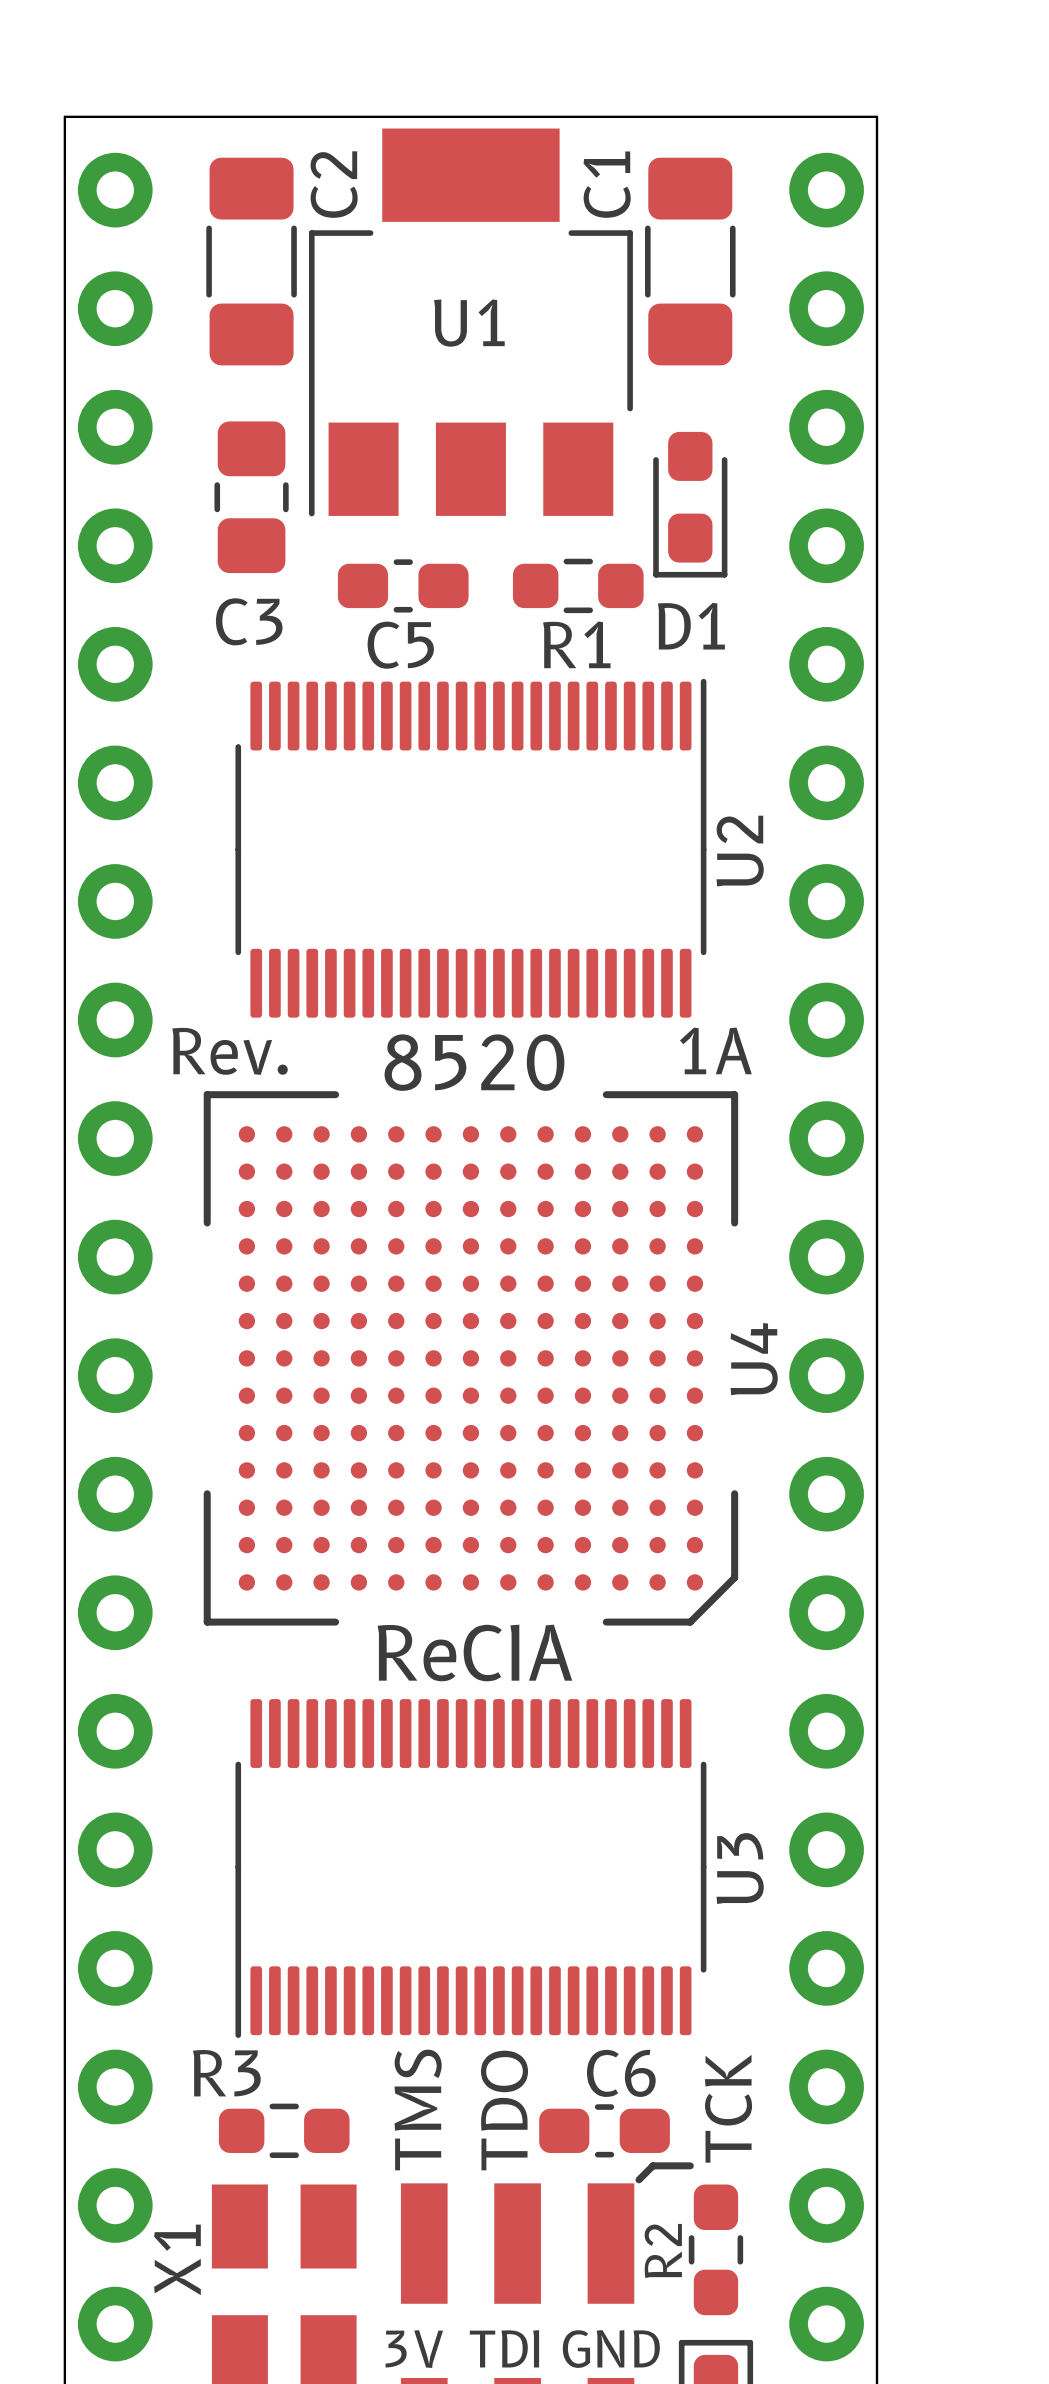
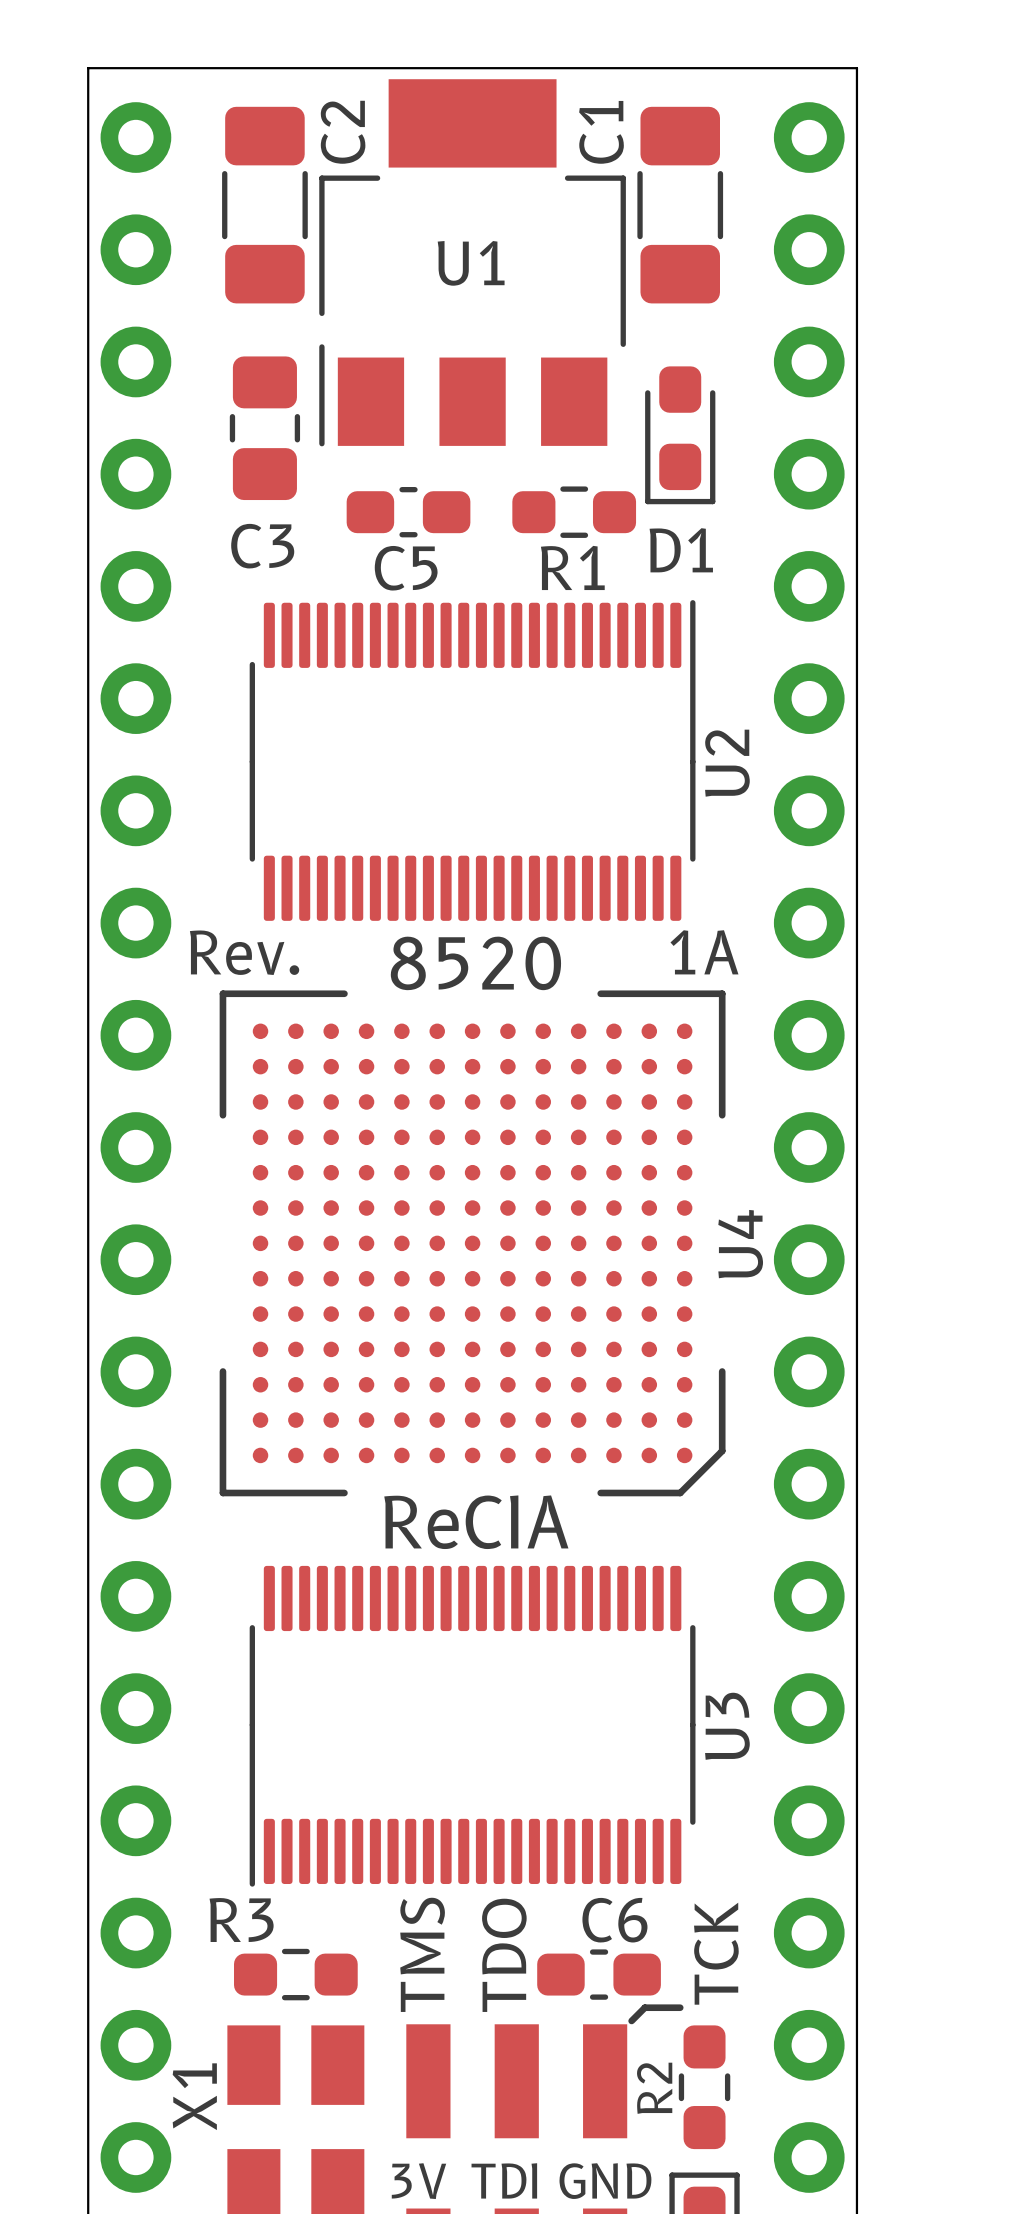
U1 footprint: [308, 128, 633, 517] -> [319, 79, 626, 447]

